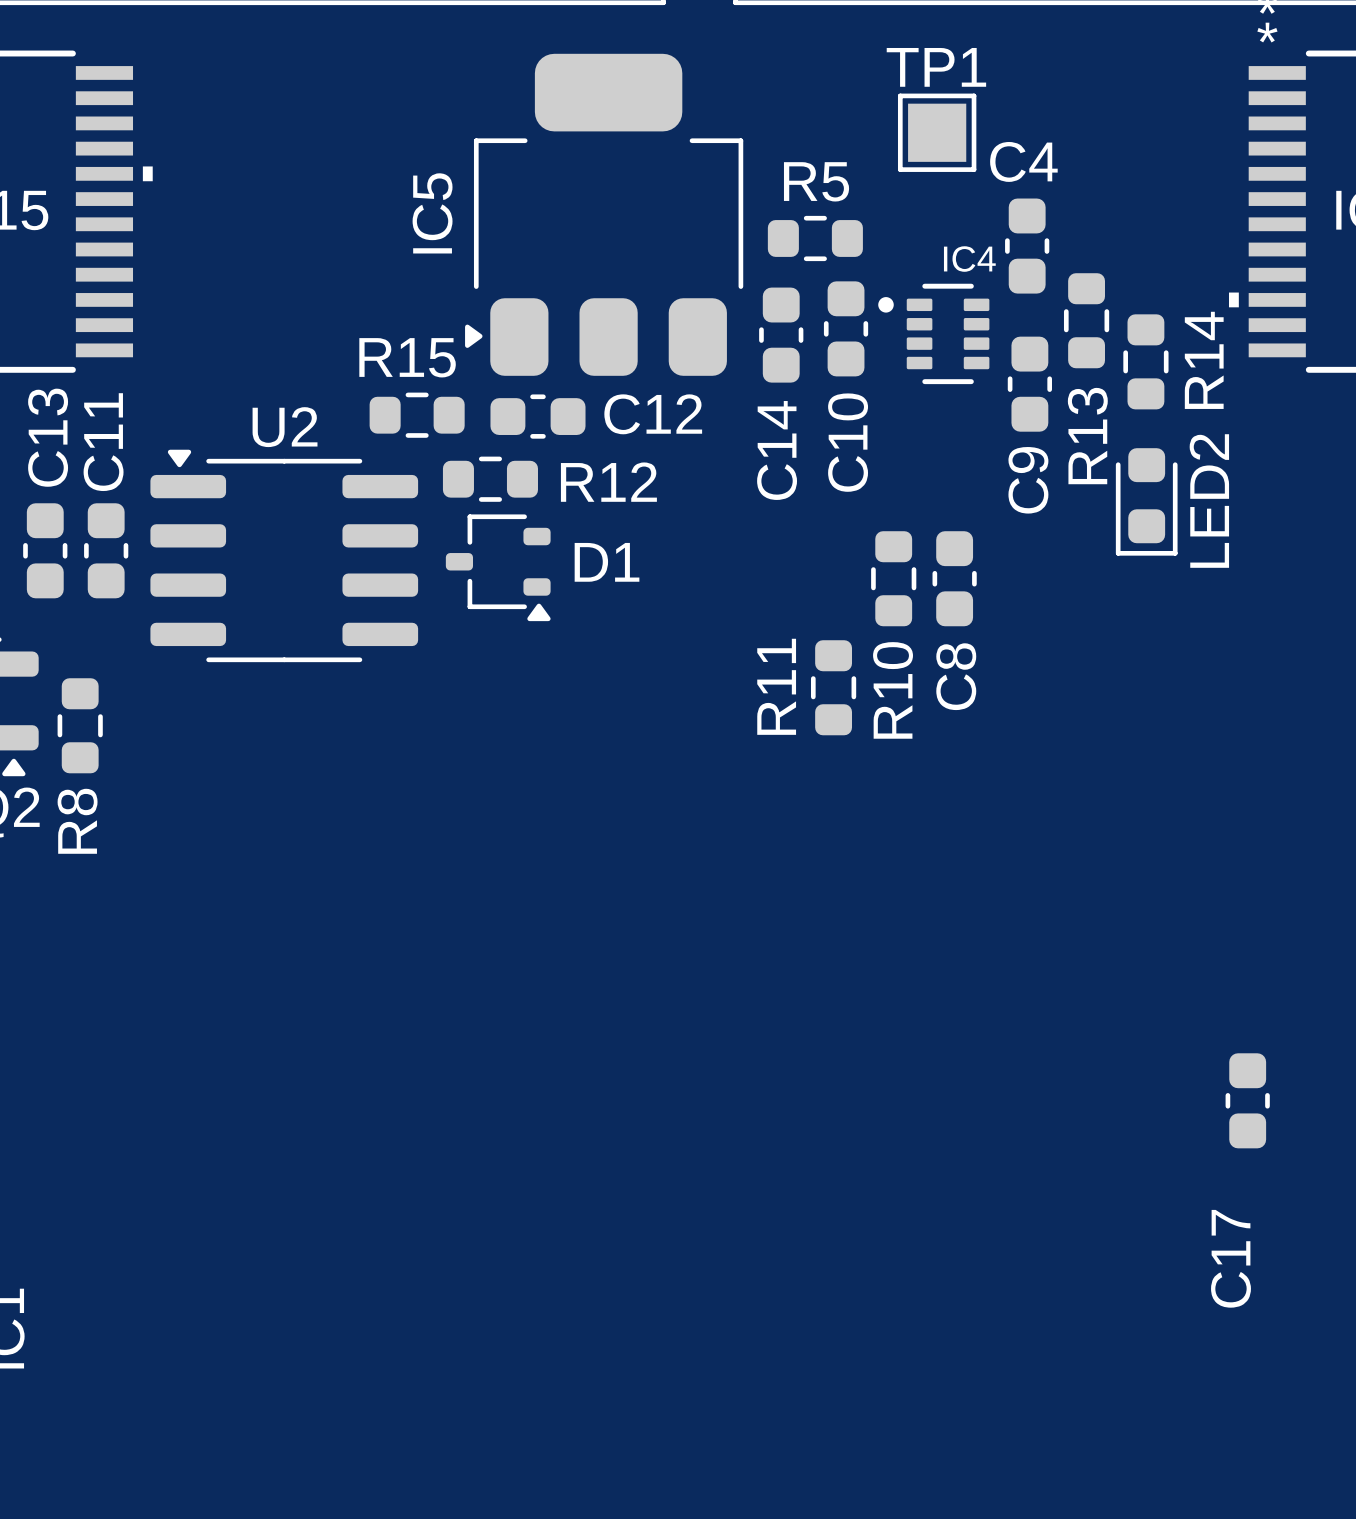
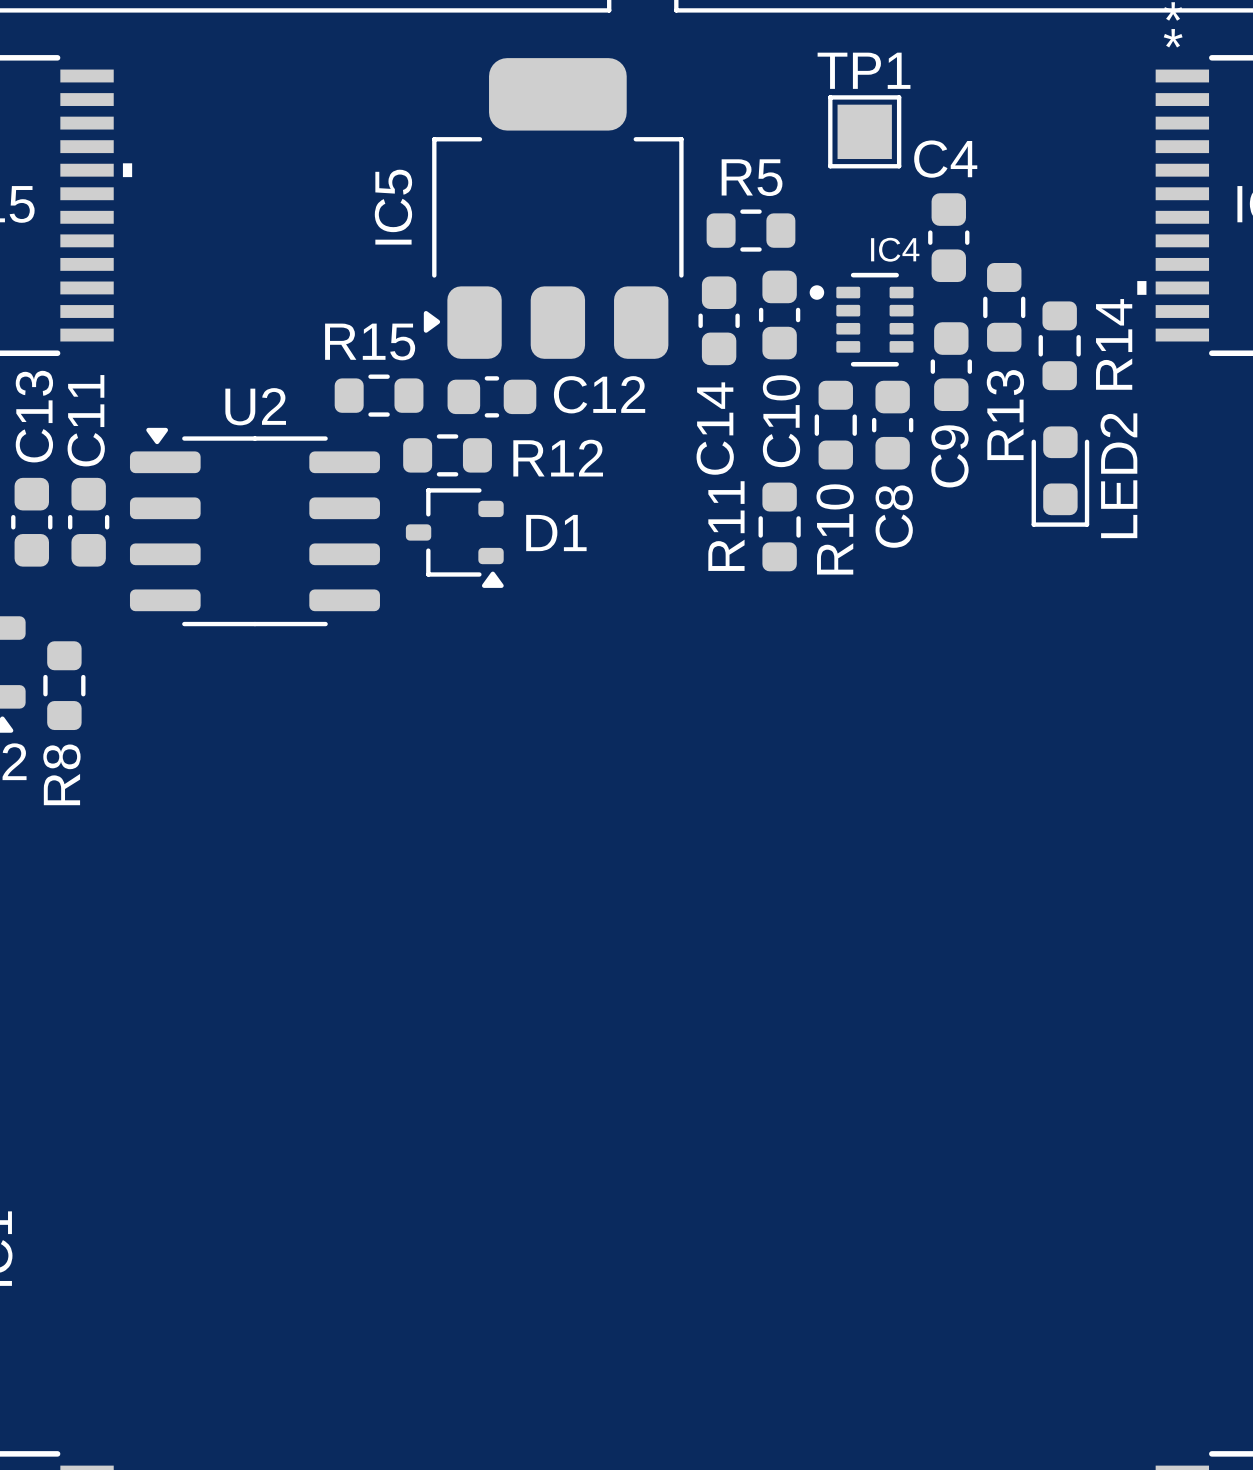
R10 position: (893, 578) -> (835, 425)
C8 position: (954, 578) -> (892, 425)
R11 position: (833, 687) -> (779, 526)
C17: (1247, 1100) -> none

